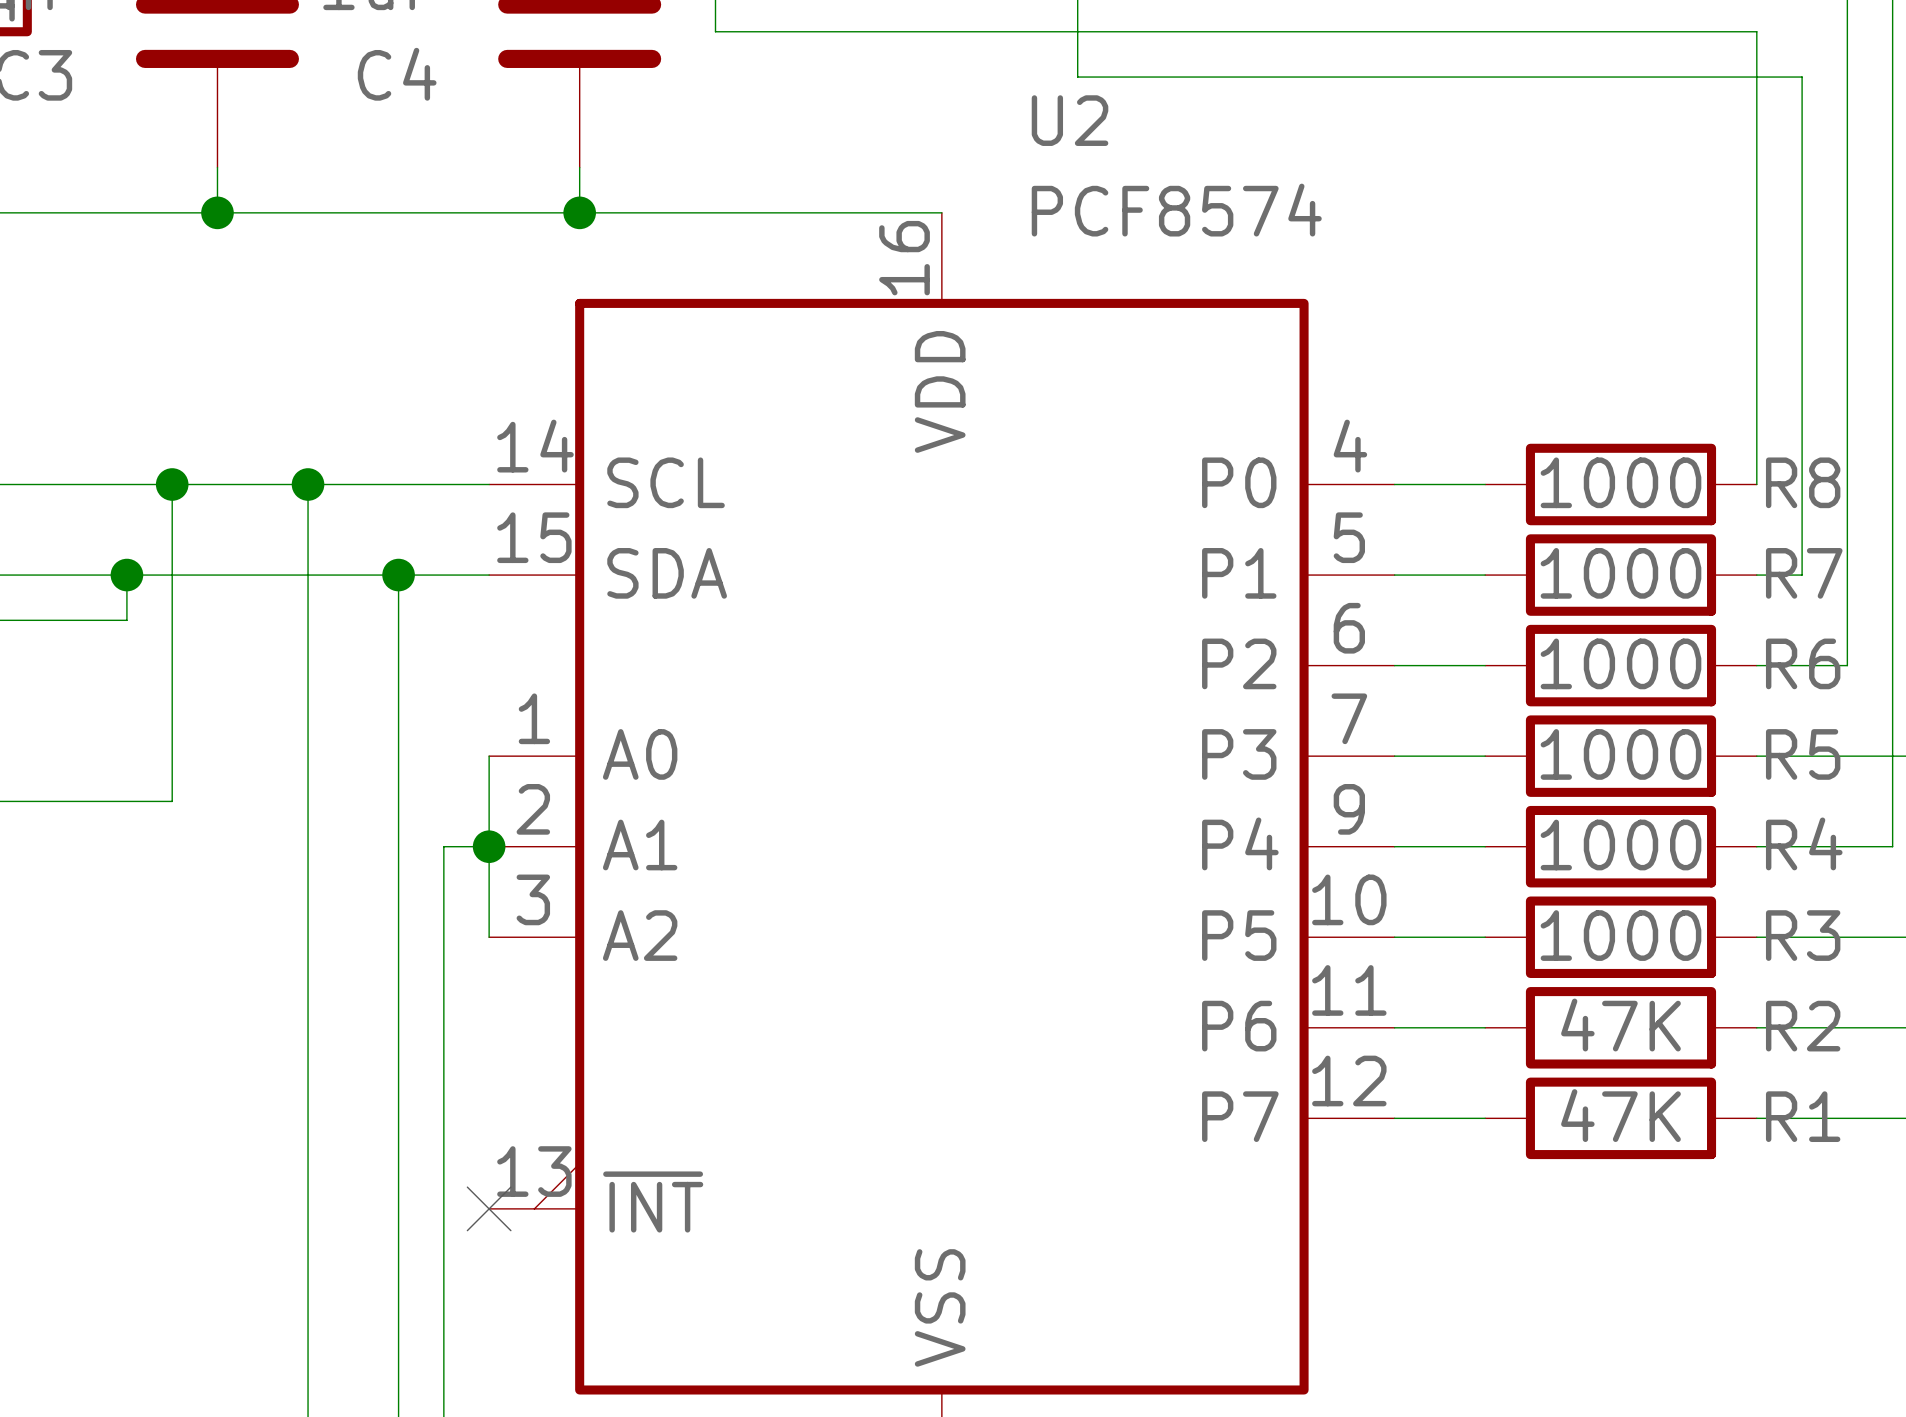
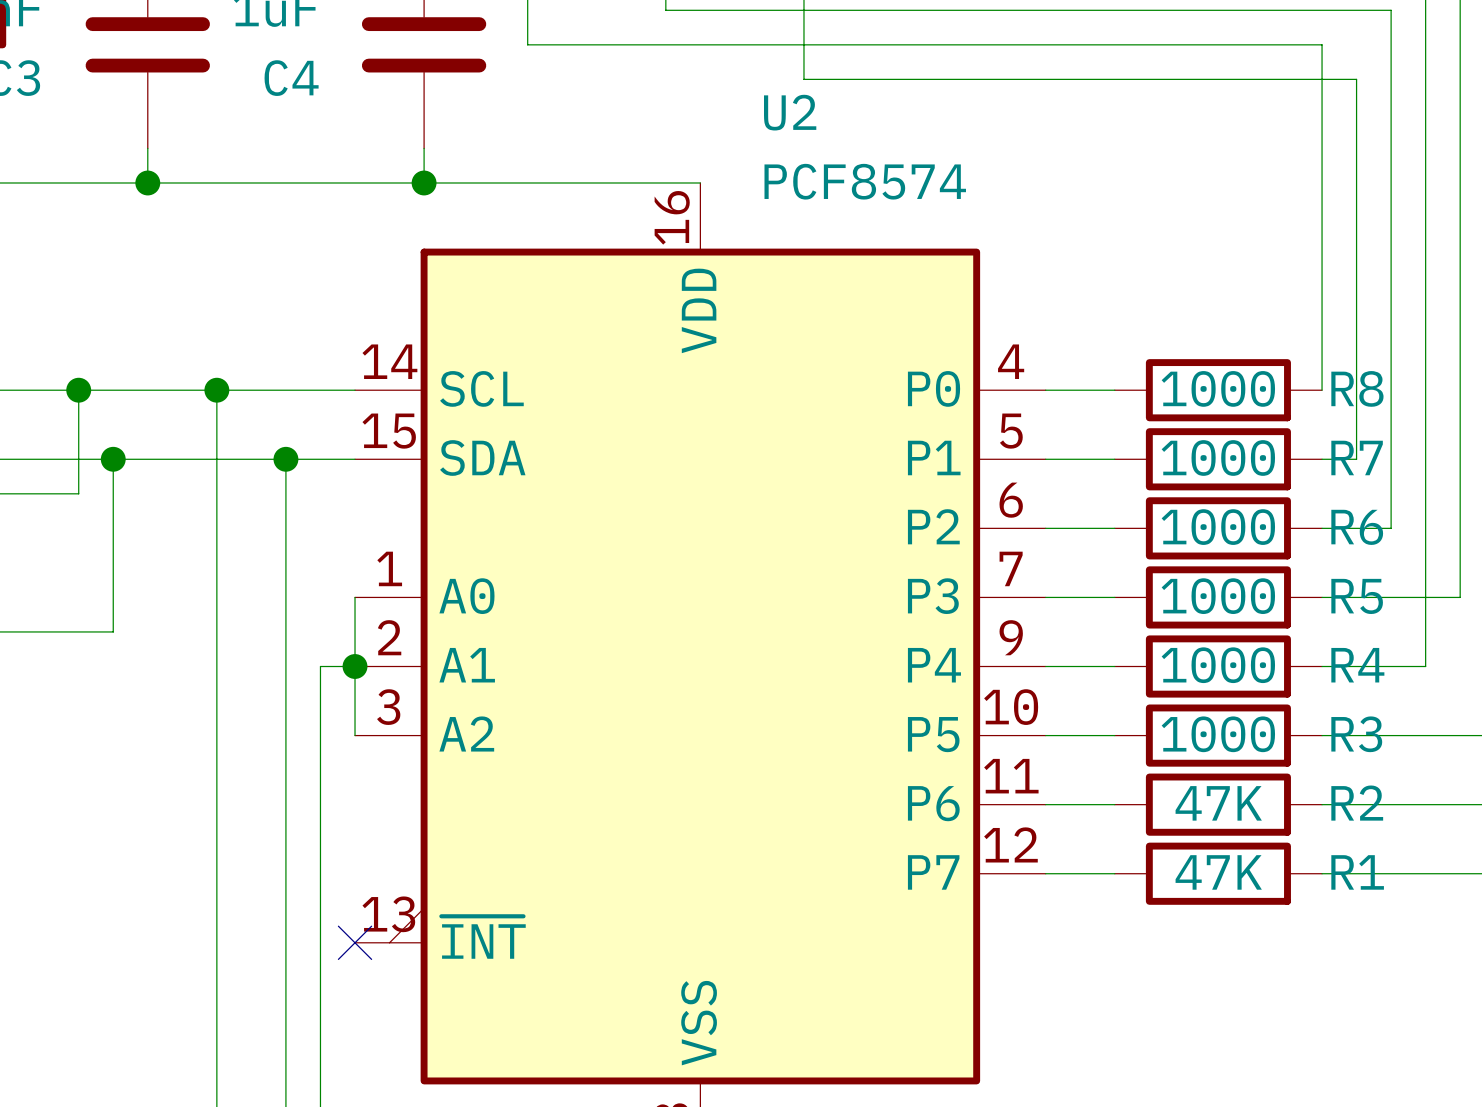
junction: none -> (78, 390)
wire: (172, 484) (172, 575) -> (78, 390) (78, 459)
junction: (172, 484) -> none
junction: (126, 575) -> none
junction: none -> (113, 459)

